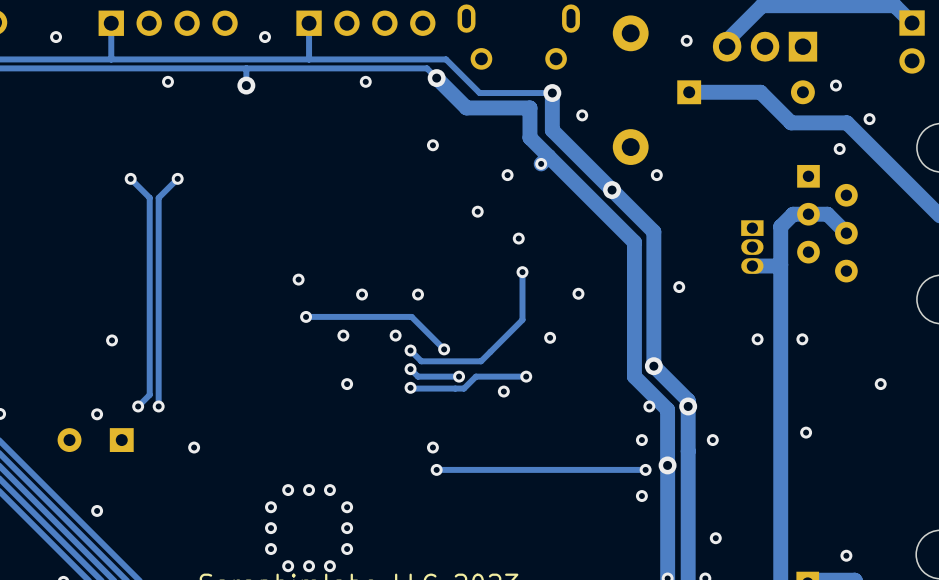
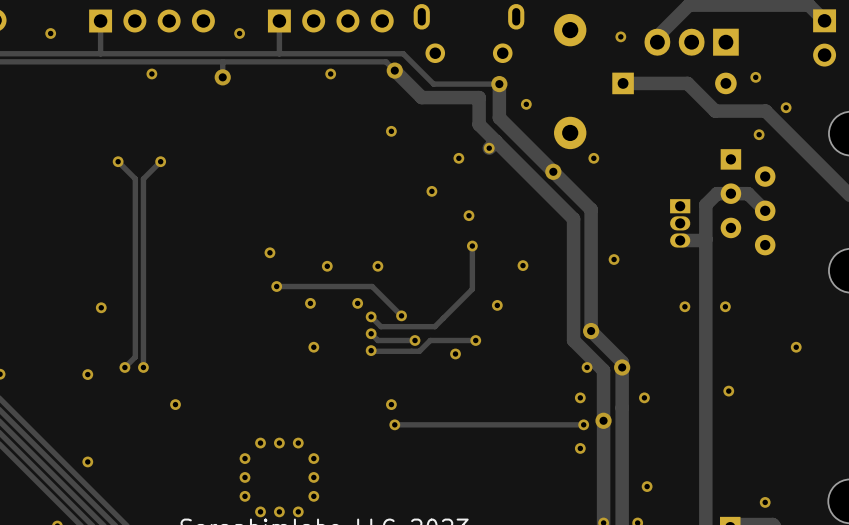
part: (95, 440) -> none

